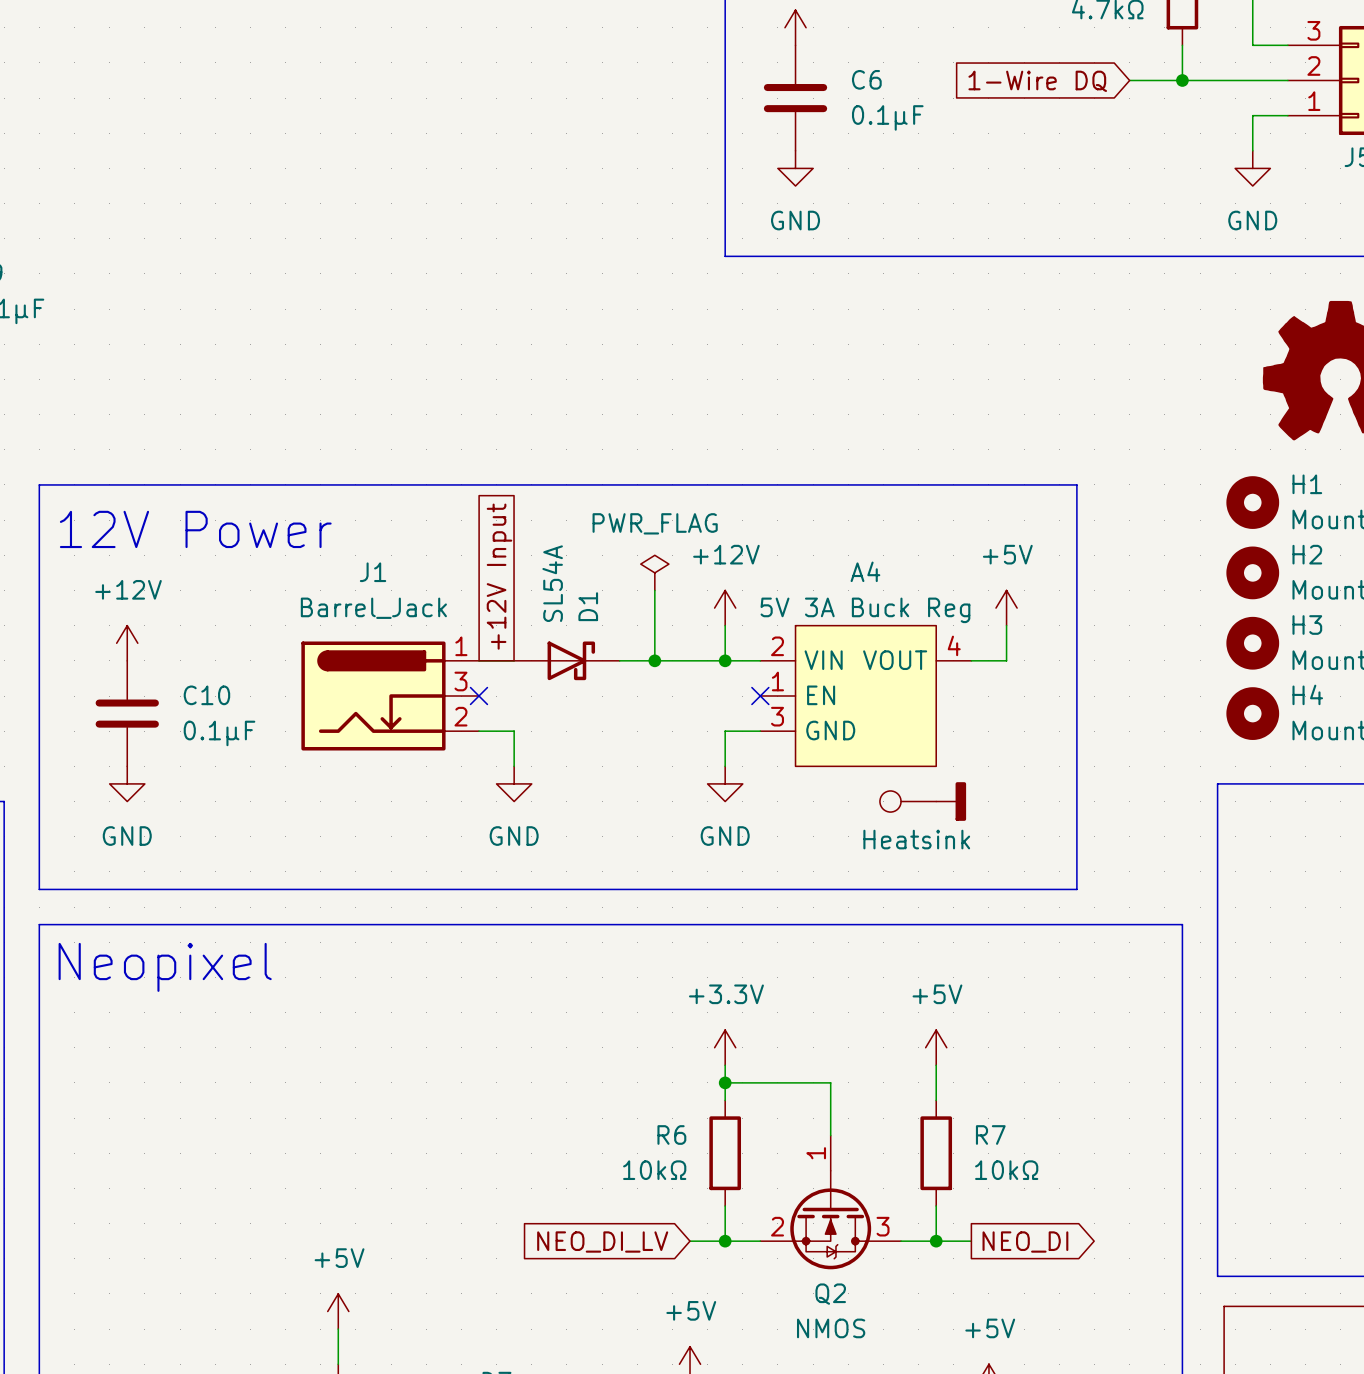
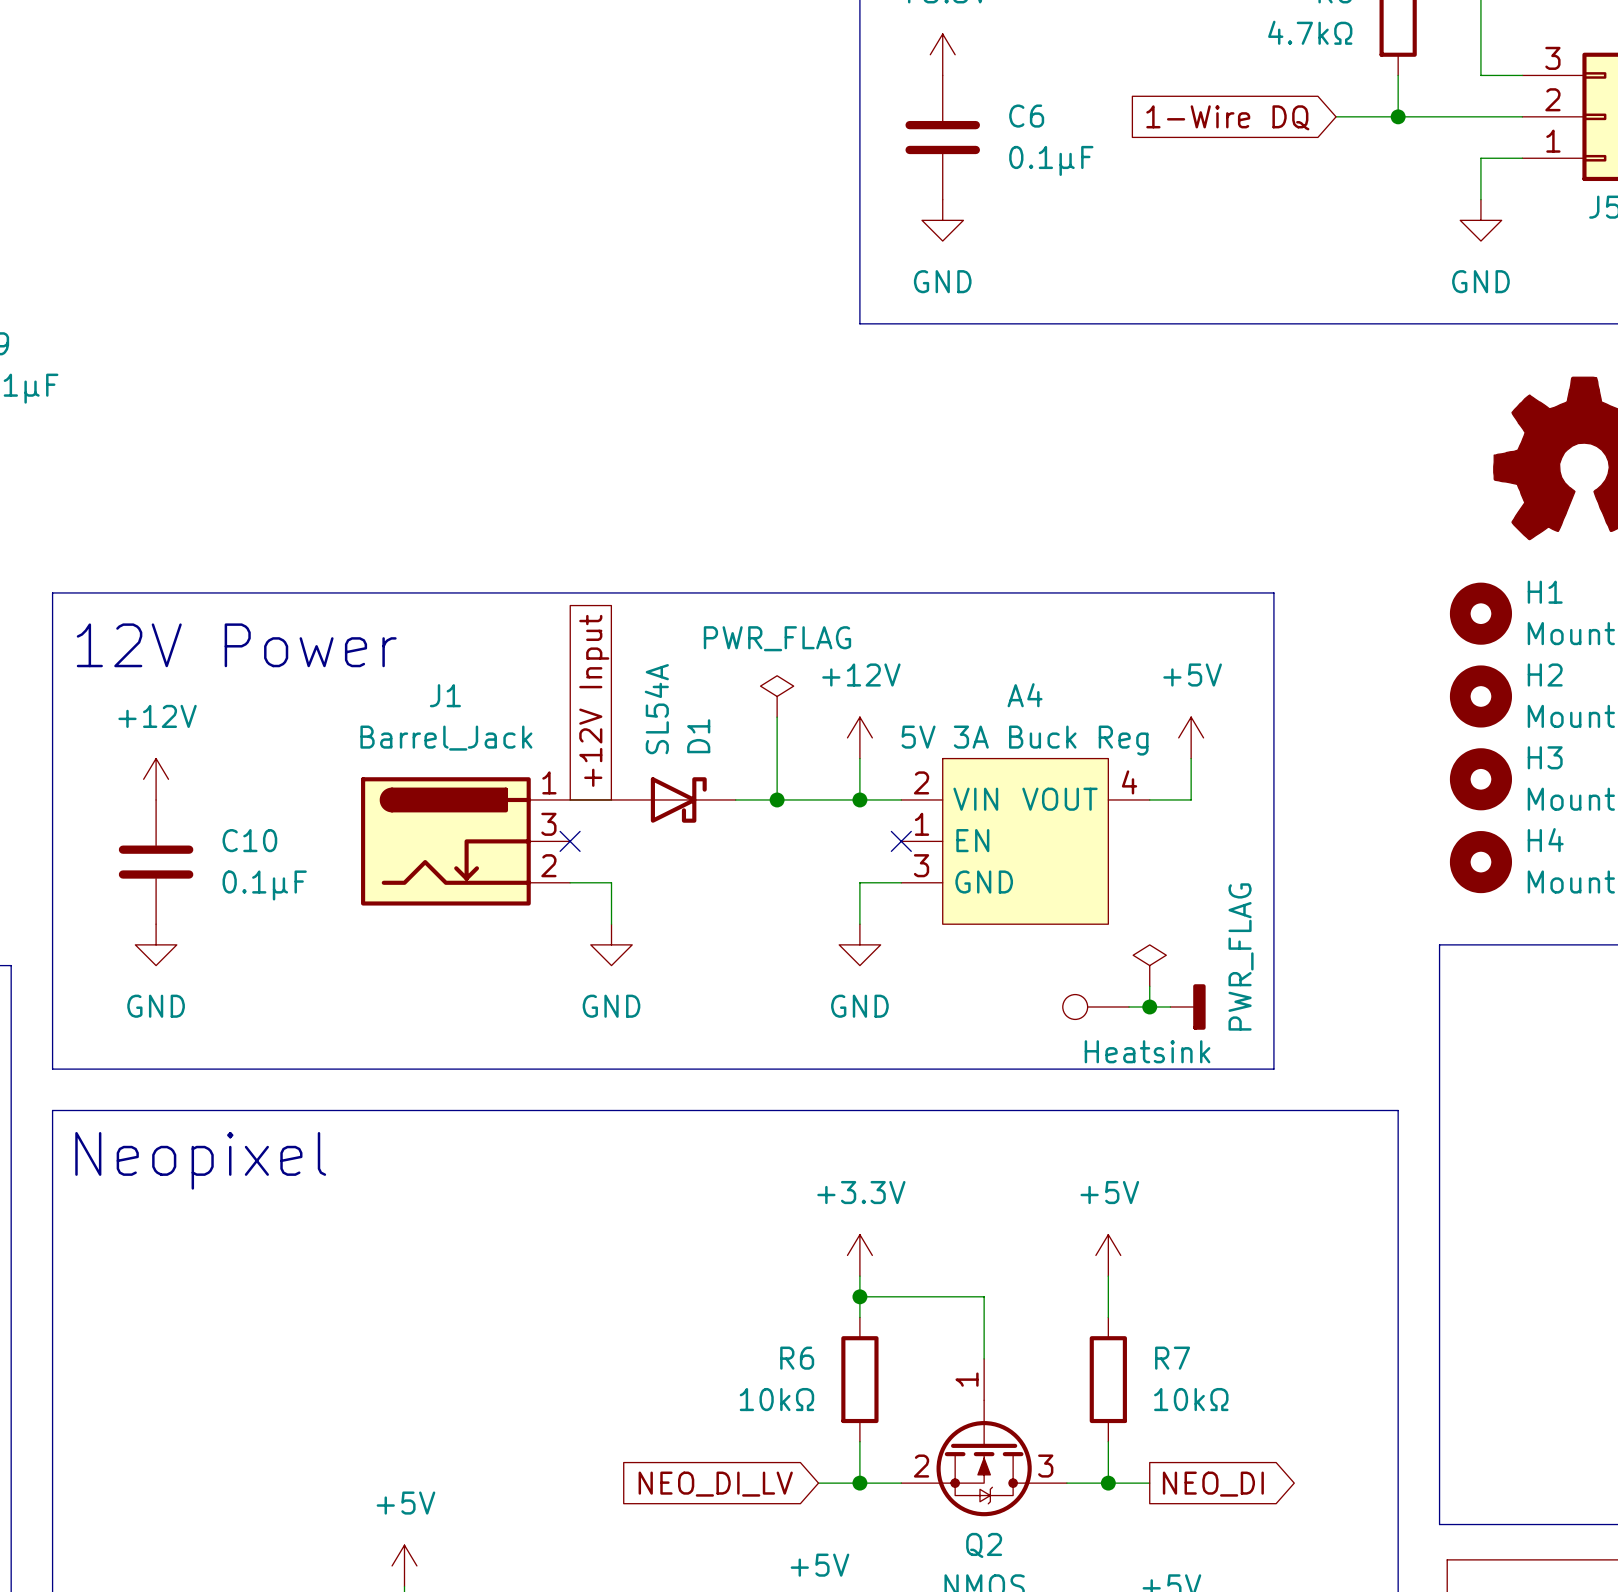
part position: (908, 801) -> (1095, 1006)
power symbol position: Heatsink (951, 801) -> Heatsink (1188, 1006)
power symbol: none -> PWR_FLAG (1149, 965)
wire: none -> (1149, 986) (1149, 1006)
wire: none -> (1129, 1006) (1170, 1006)
junction: none -> (1149, 1006)

